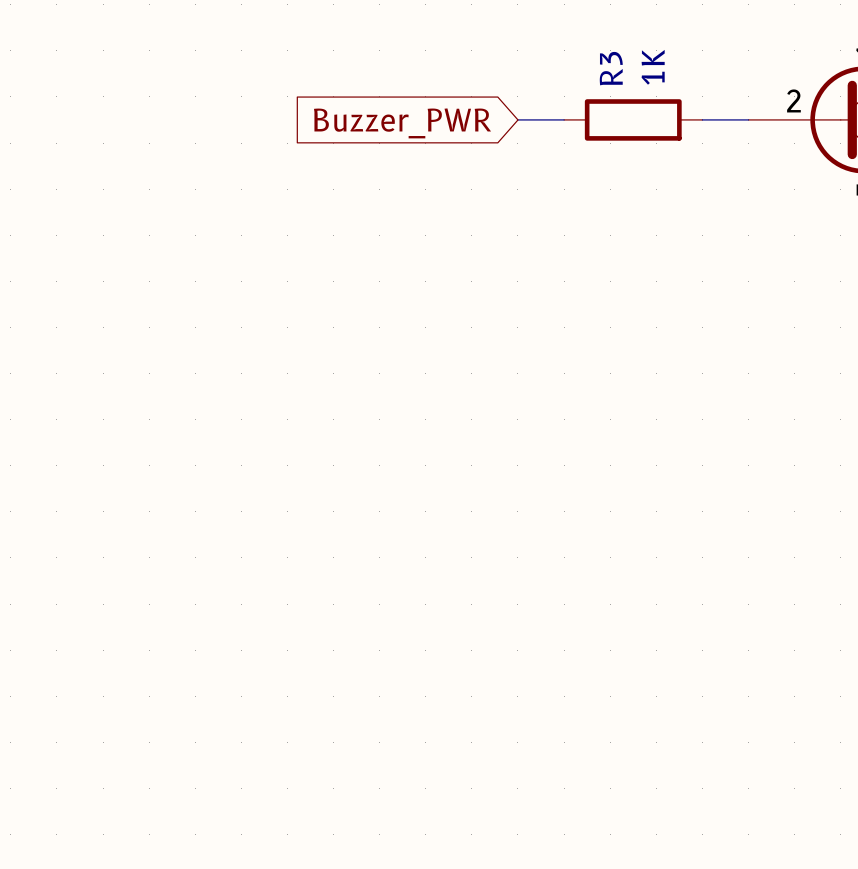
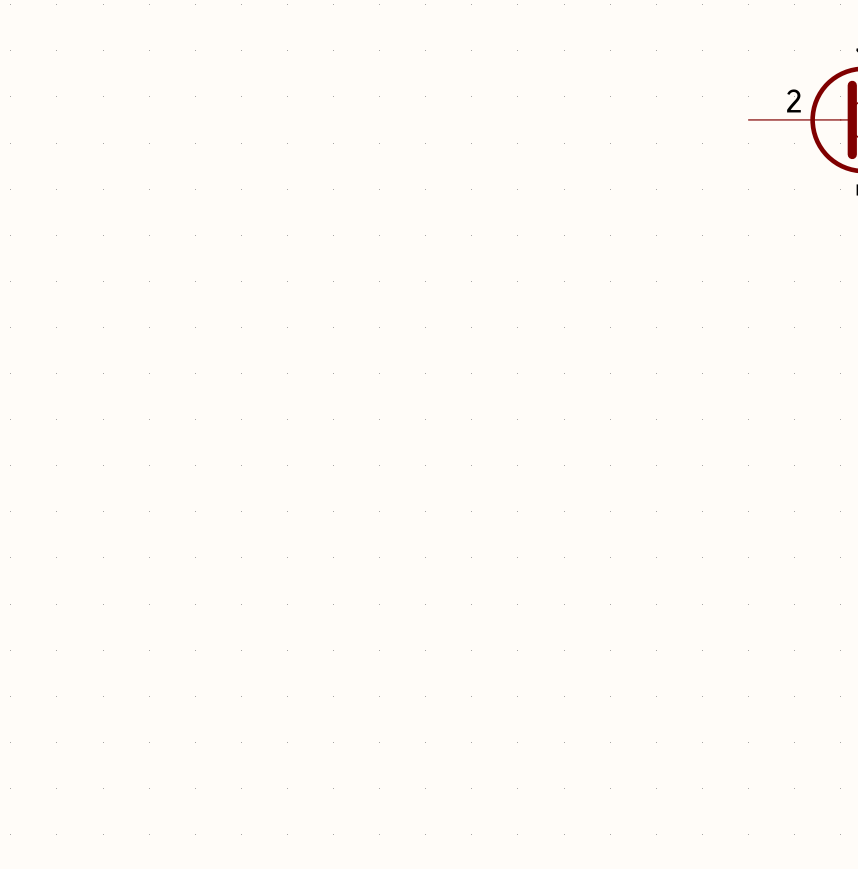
wire: (517, 119) (564, 119) -> none
R3: 1K (633, 119) -> none
wire: (702, 119) (748, 119) -> none
global label: Buzzer_PWR (402, 123) -> none

